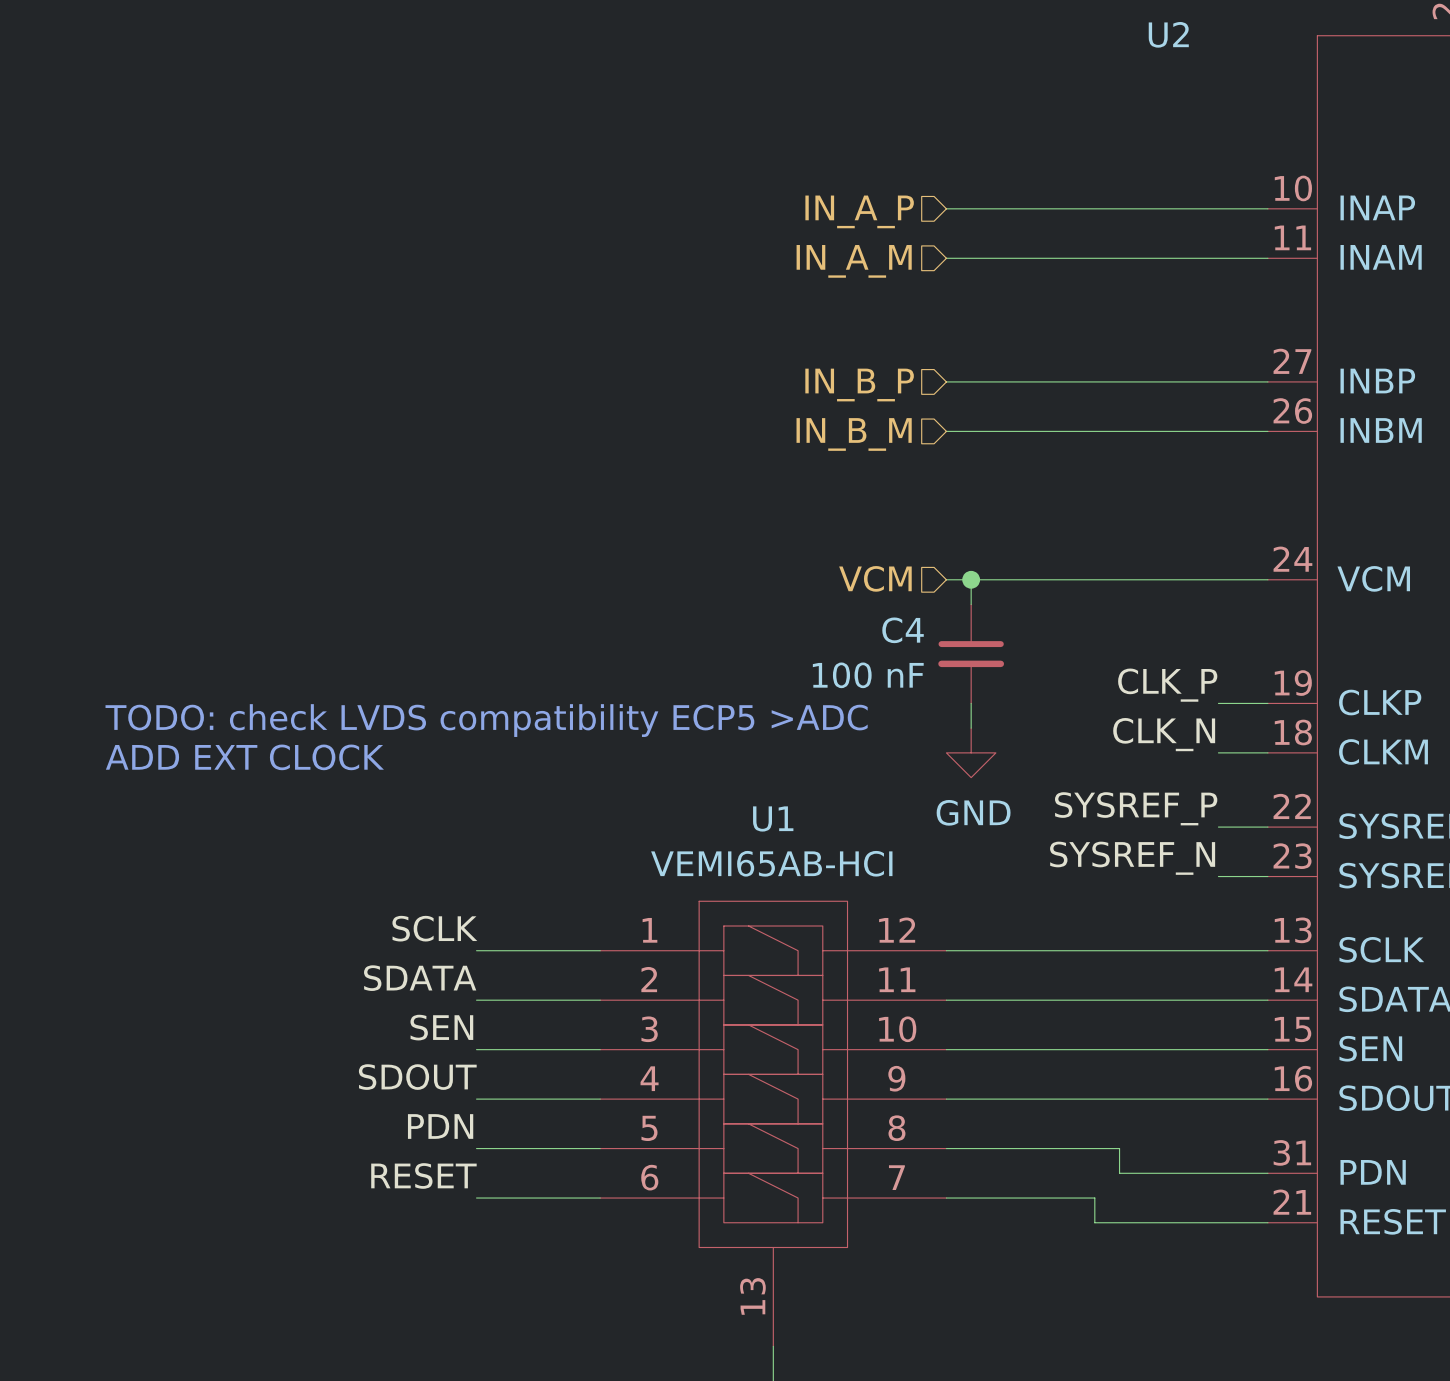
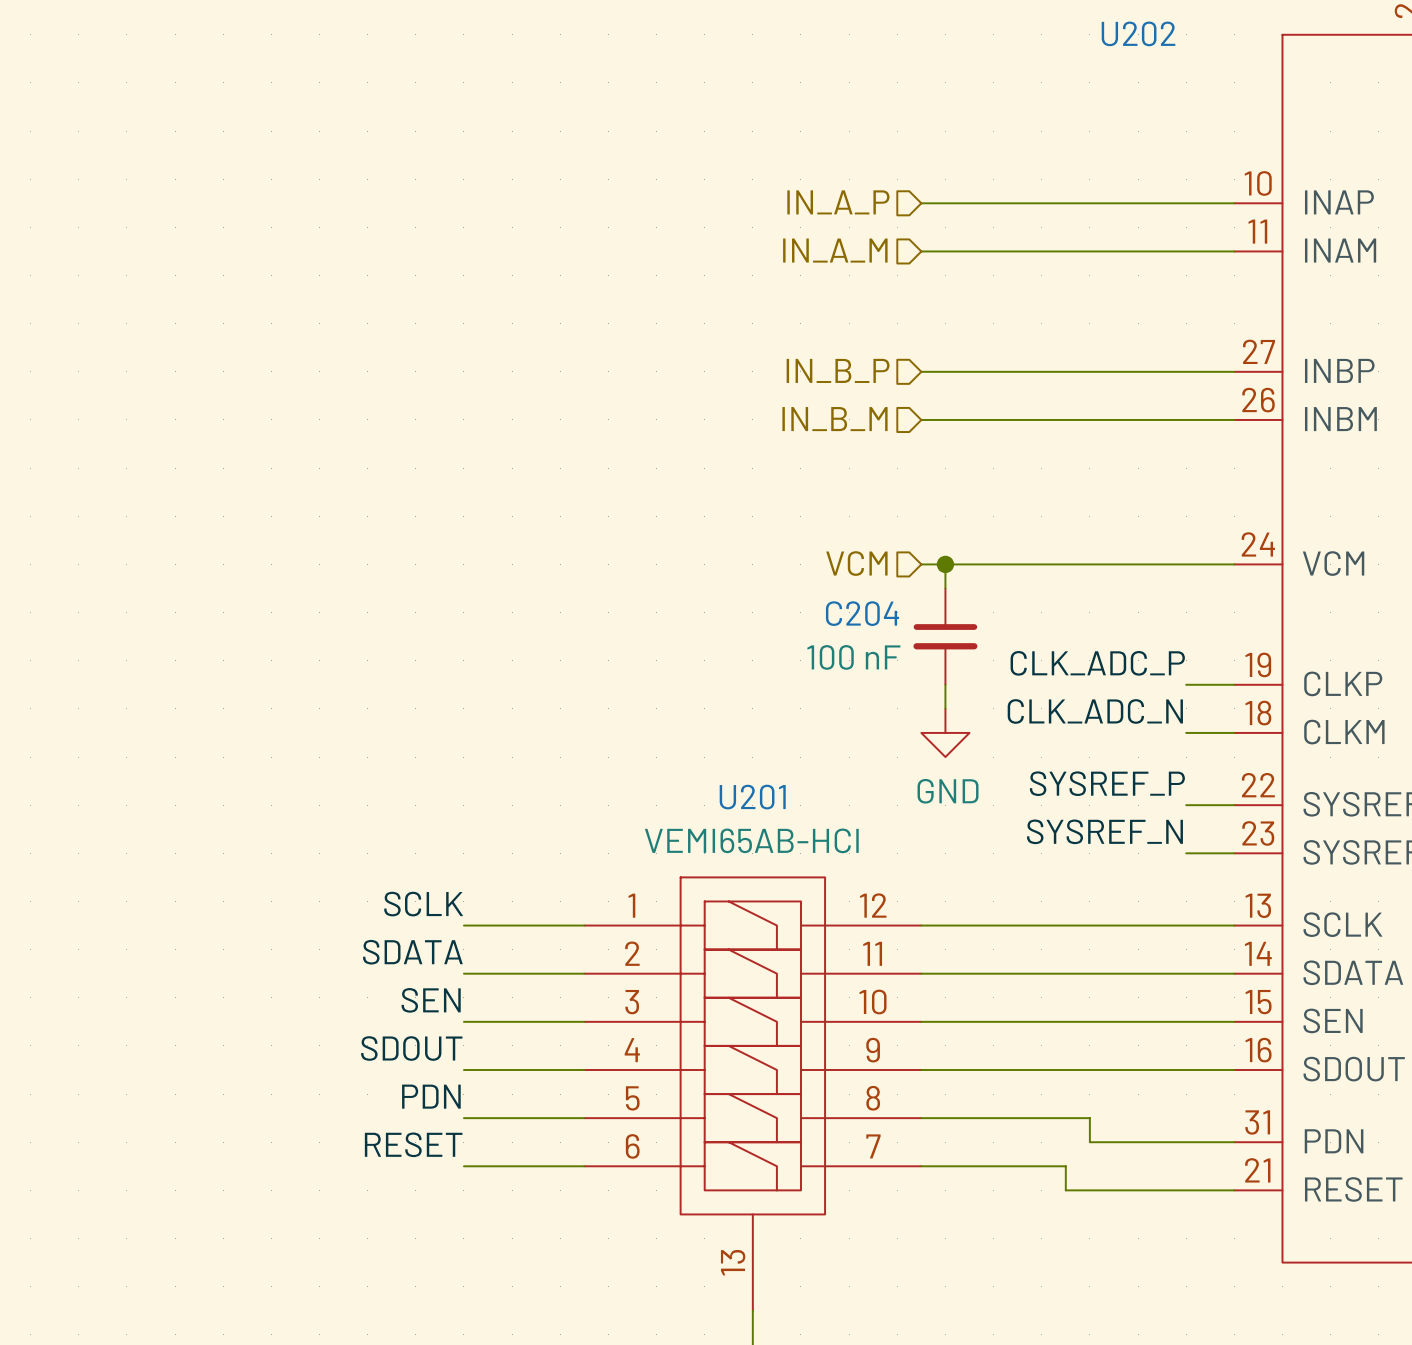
U2 name: U2 (1168, 34) -> U202 (1138, 33)
C4 name: C4 (903, 630) -> C204 (862, 613)
label: CLK_P (1167, 685) -> CLK_ADC_P (1097, 663)
text: TODO: check LVDS compatibility ECP5 >ADC (486, 720) -> none
label: CLK_N (1164, 734) -> CLK_ADC_N (1095, 711)
text: ADD EXT CLOCK (244, 757) -> none
U1 name: U1 (773, 818) -> U201 (752, 797)

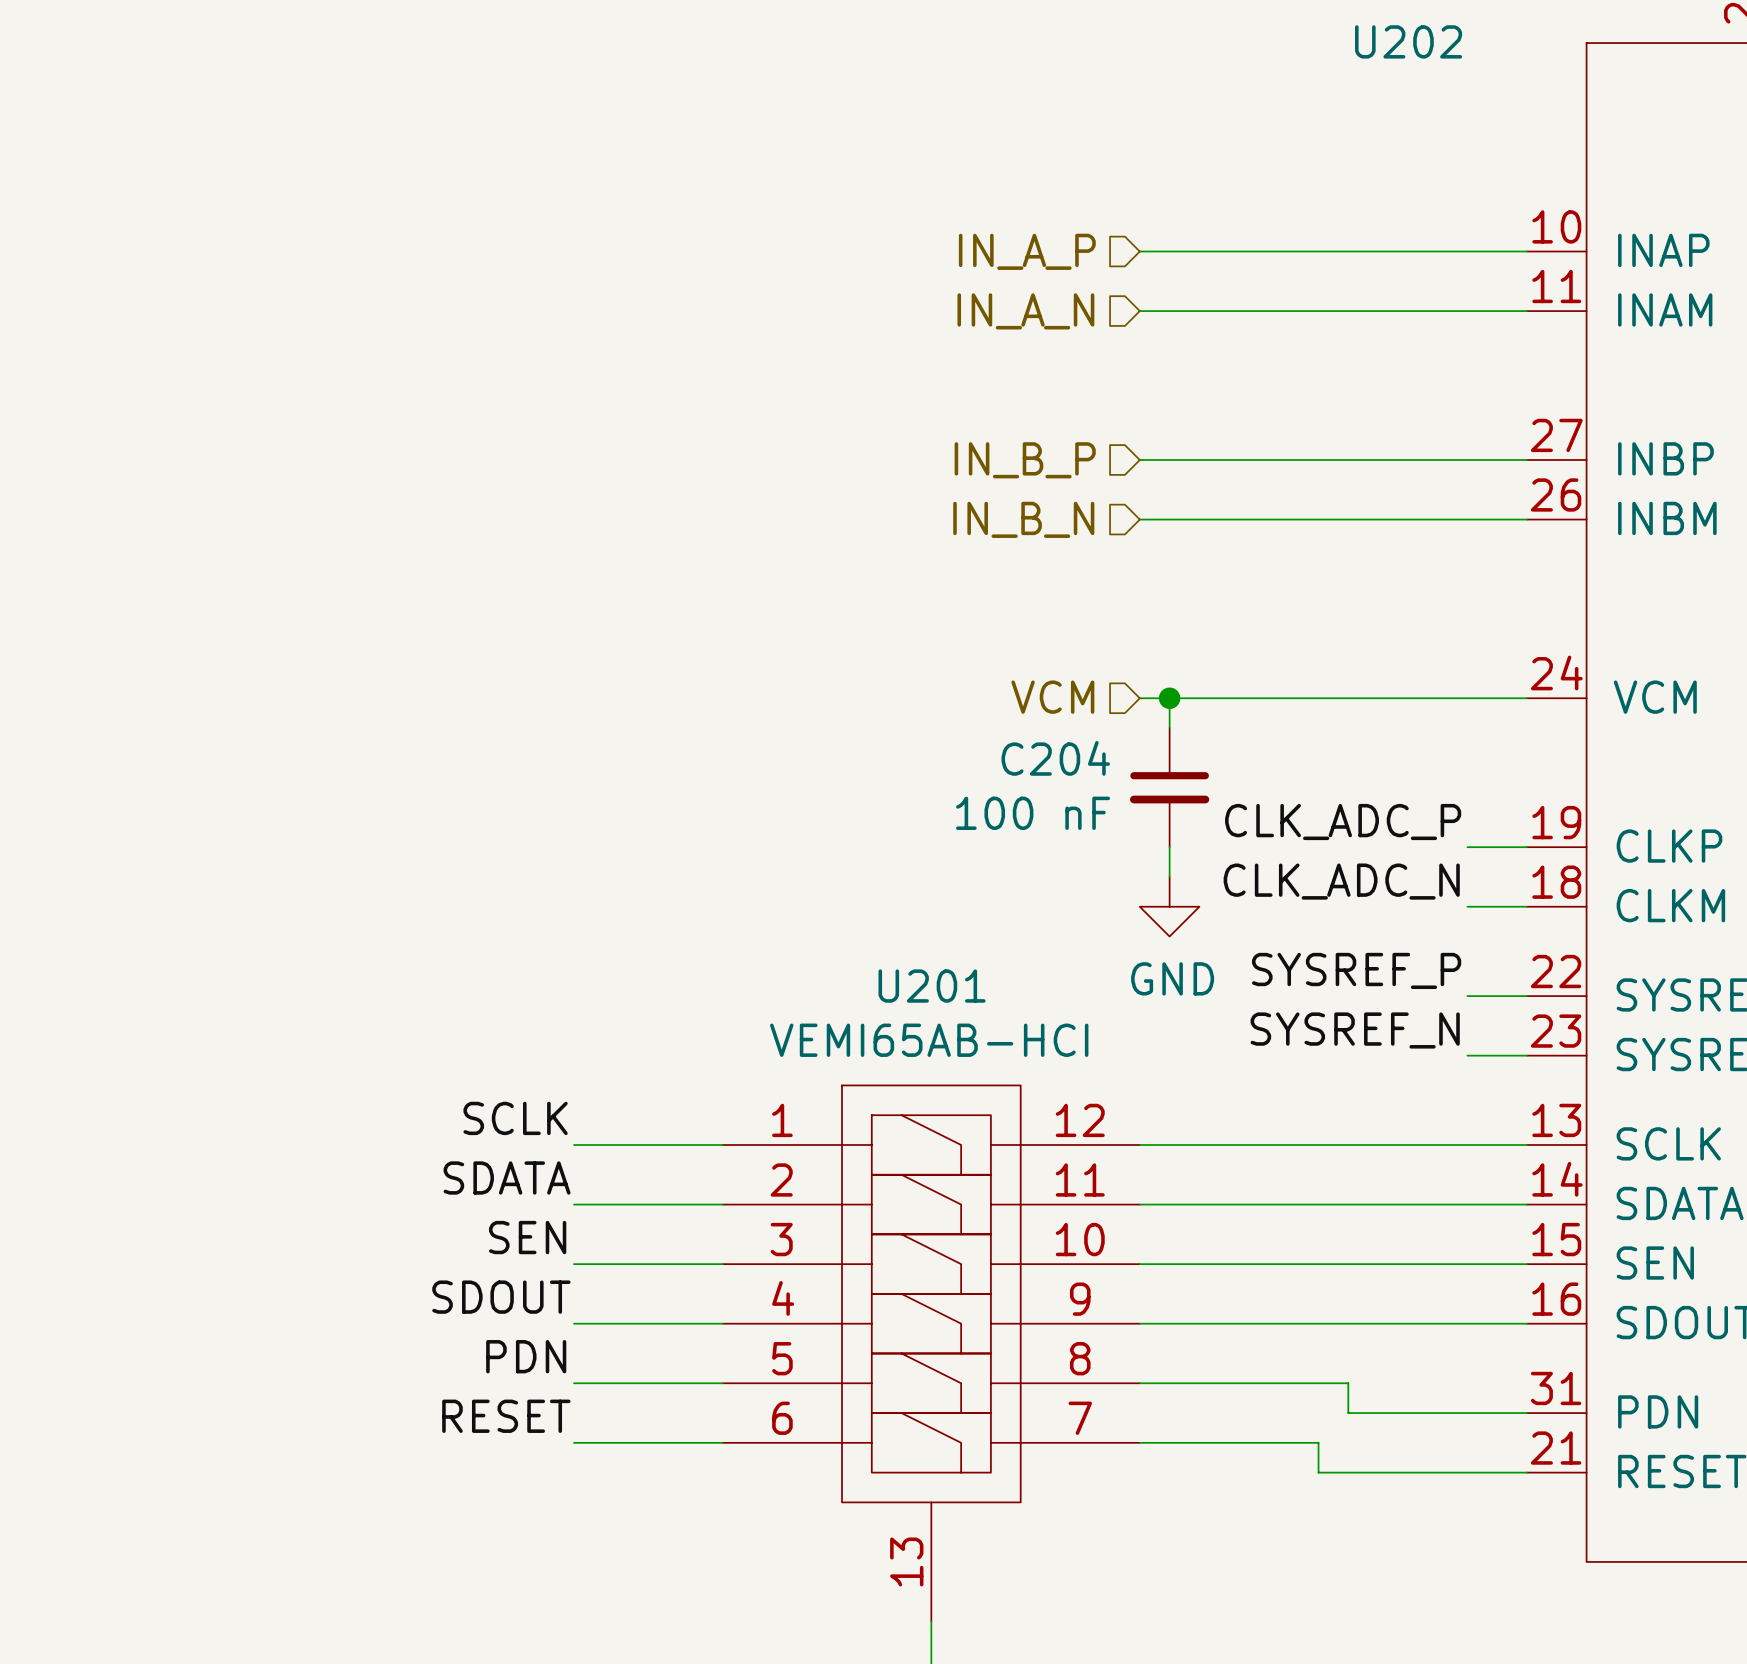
hierarchical label: IN_A_M (835, 250) -> IN_A_N (1025, 311)
hierarchical label: IN_B_M (835, 419) -> IN_B_N (1023, 519)

